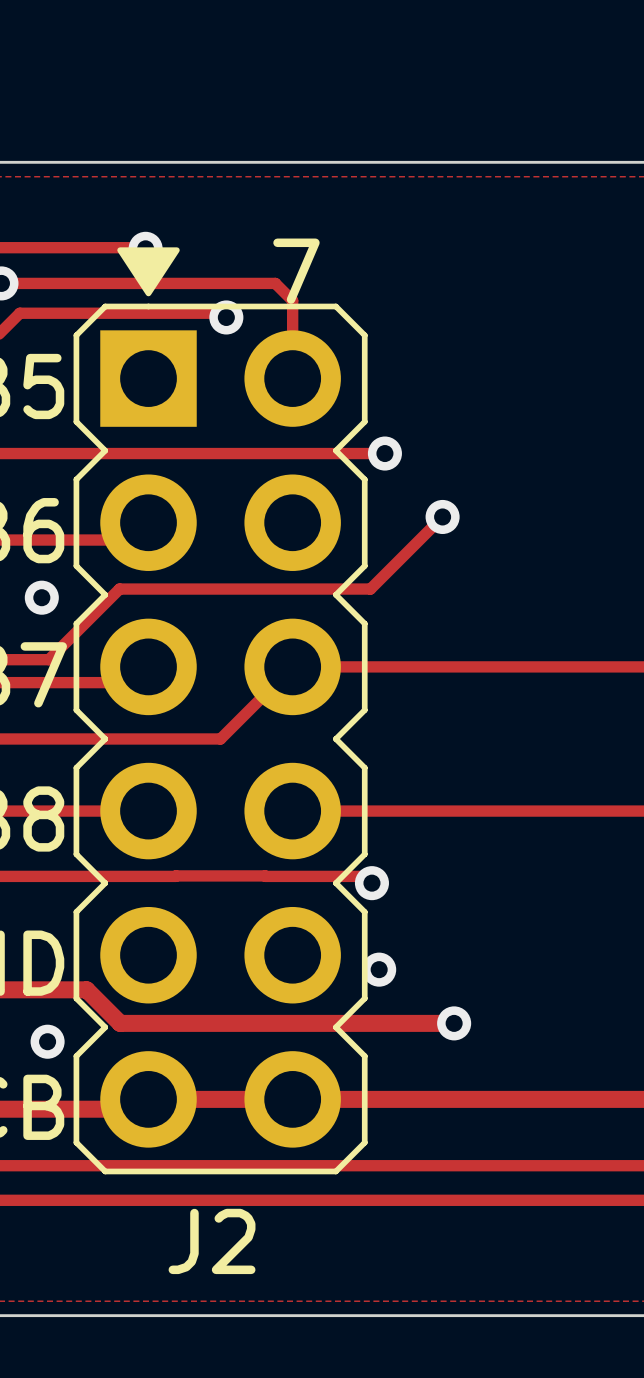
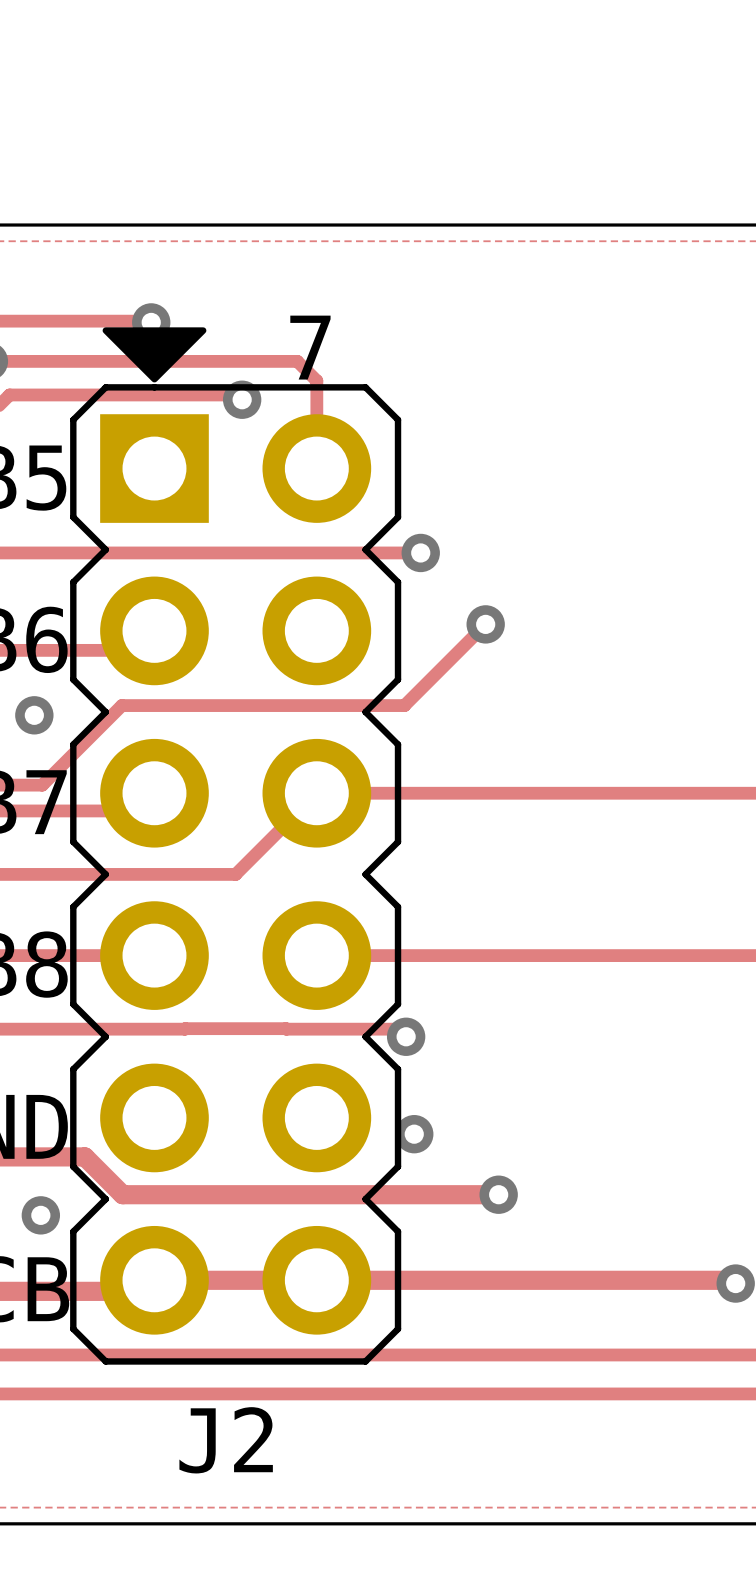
J2 footprint: [73, 247, 368, 1175] -> [70, 327, 402, 1365]

